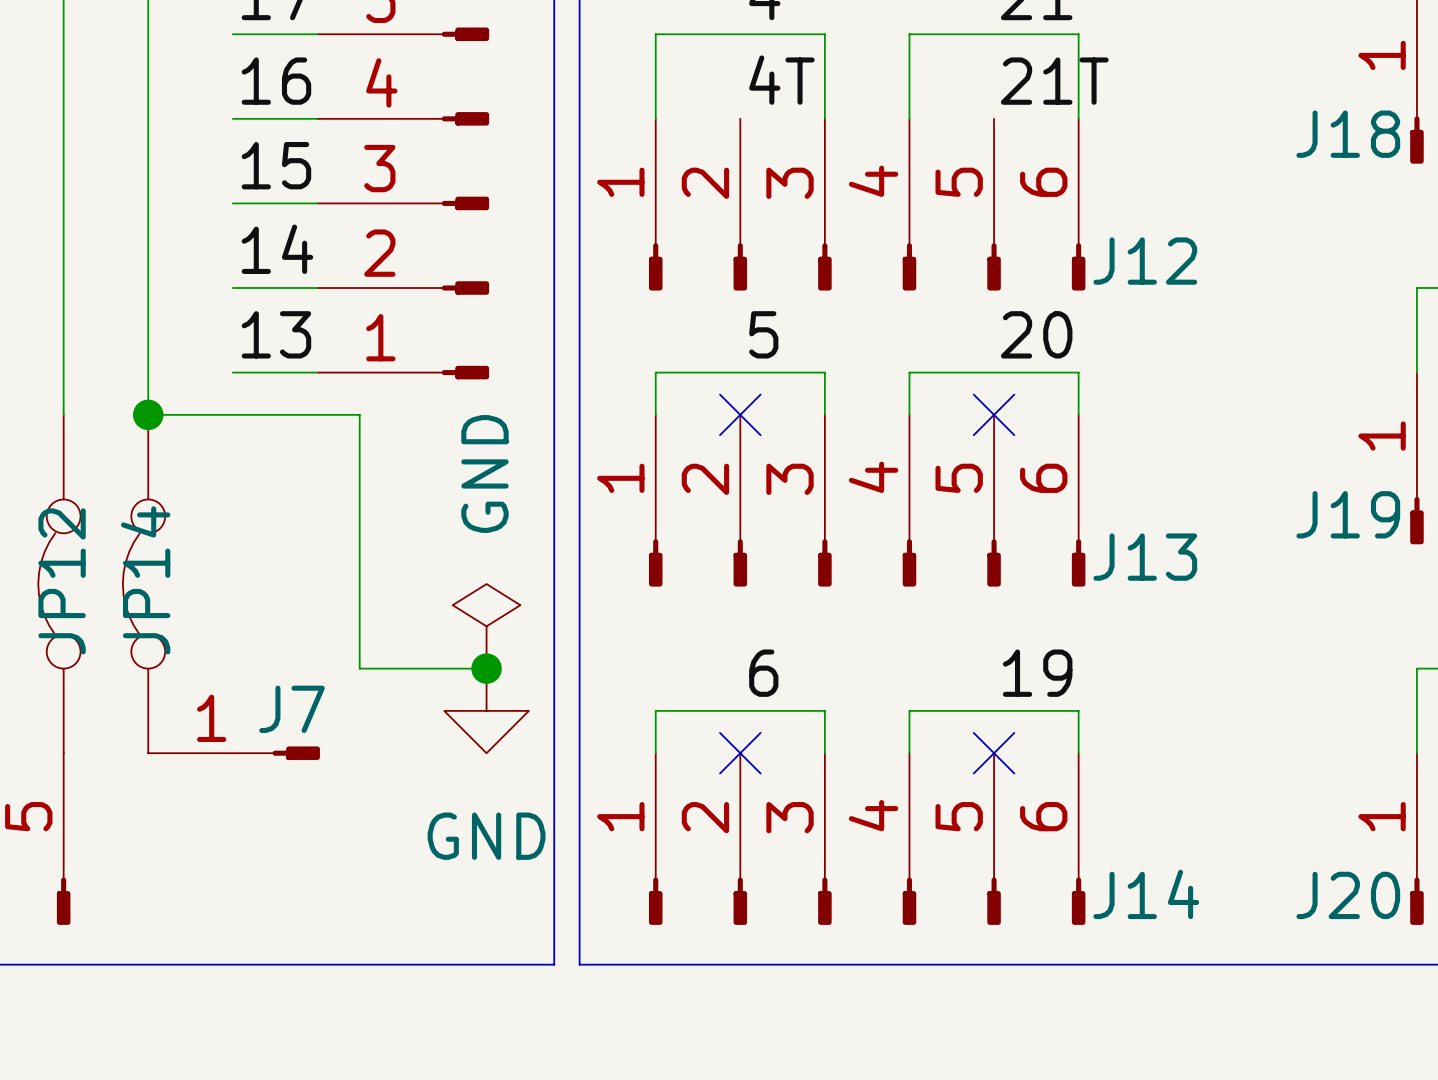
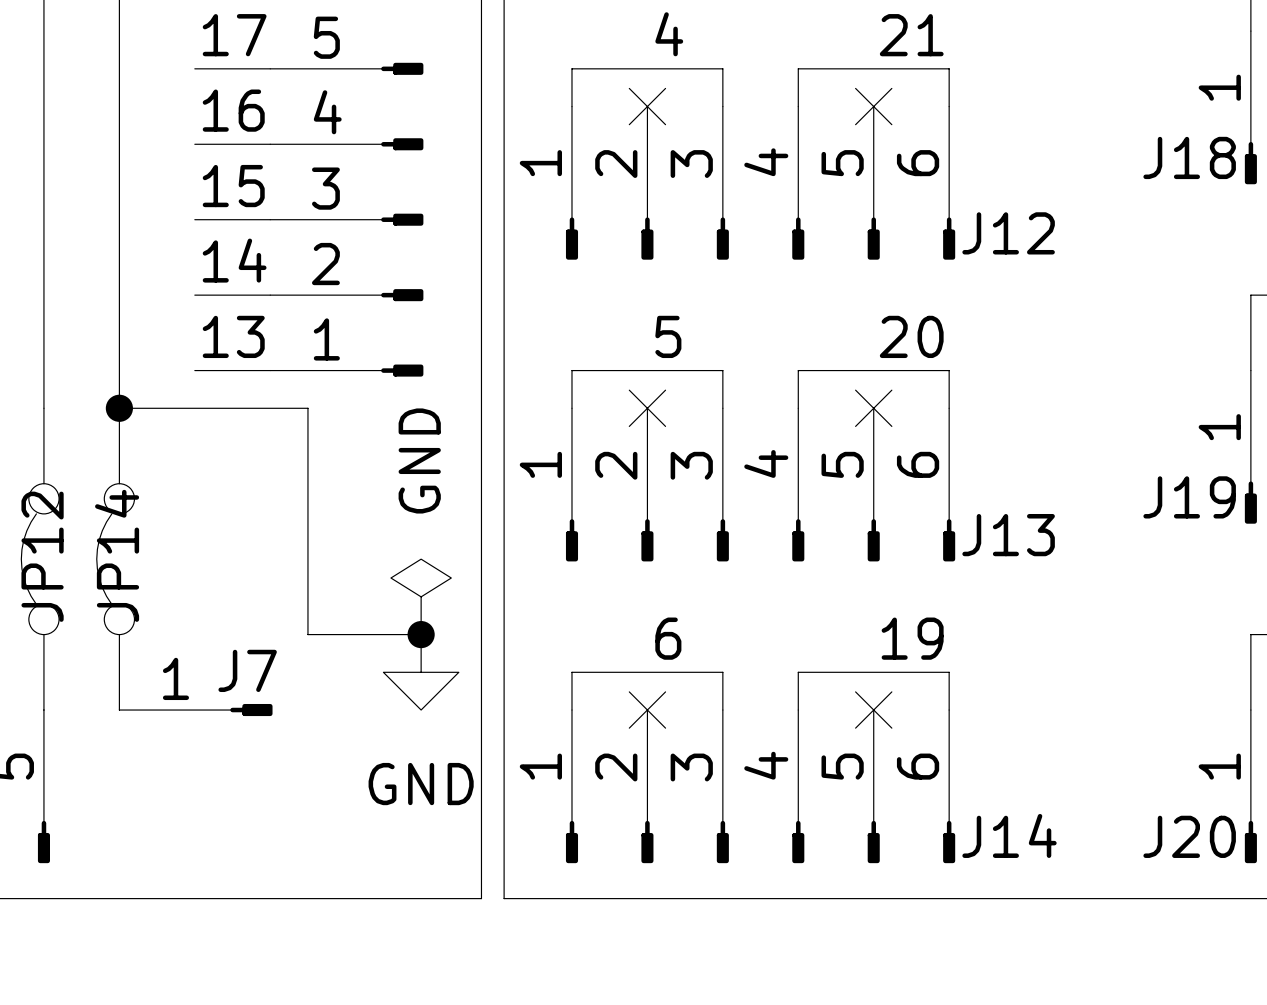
no-connect mark: none -> (647, 106)
no-connect mark: none -> (873, 106)
label: 4T (781, 80) -> none
label: 21T (1054, 81) -> none
J12 position: (867, 204) -> (760, 183)

